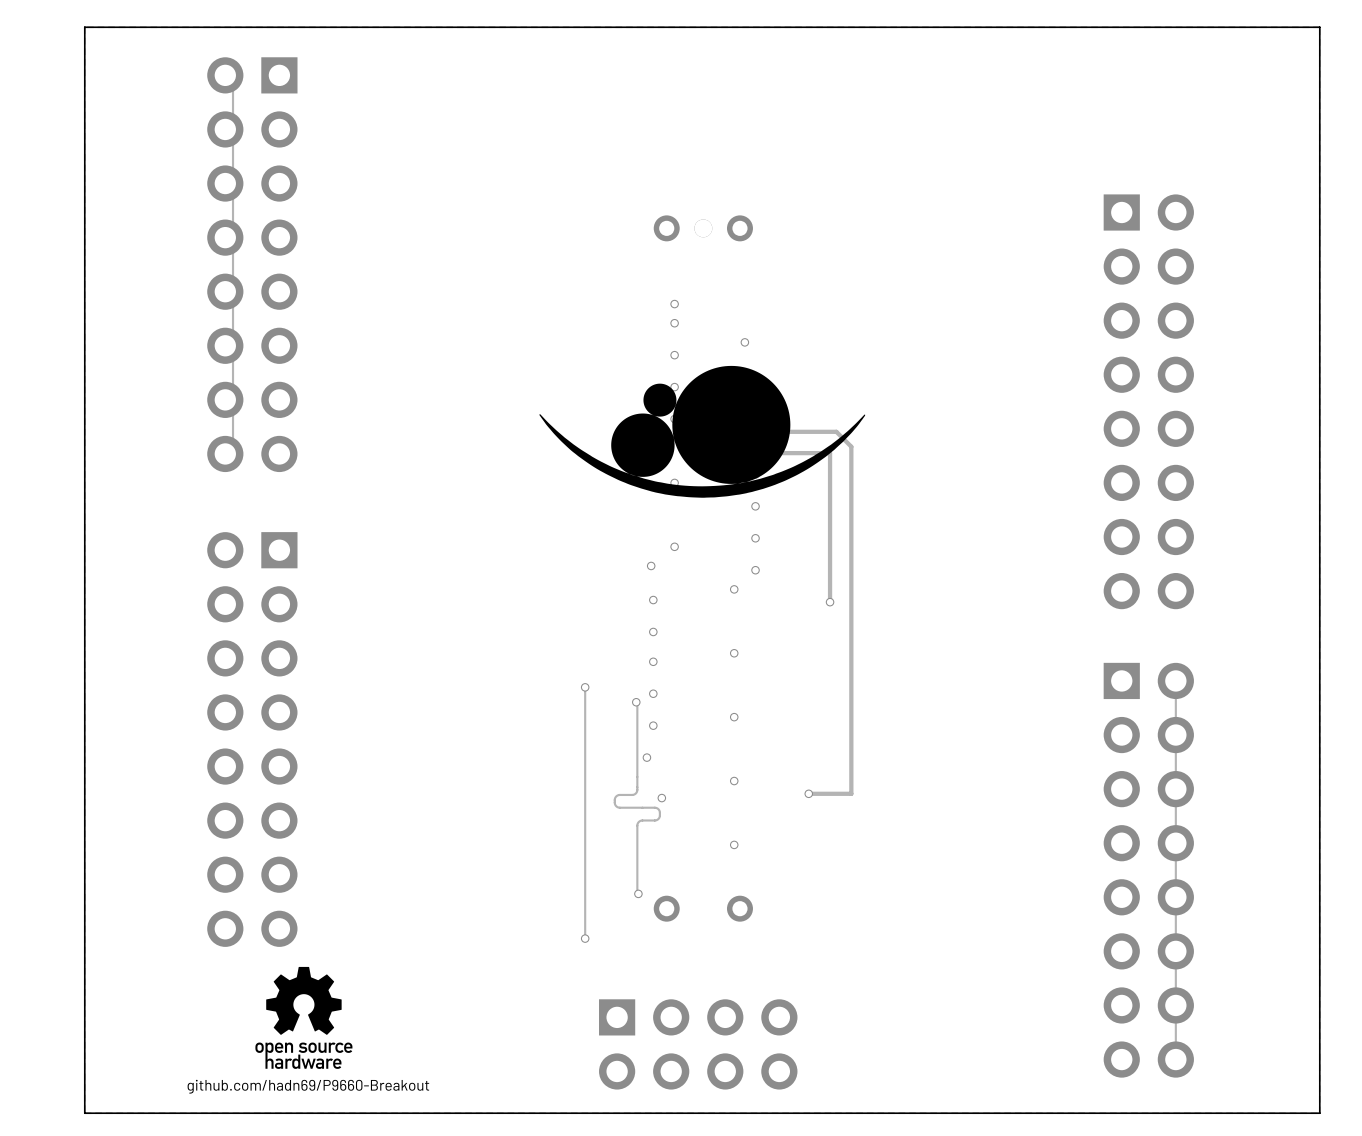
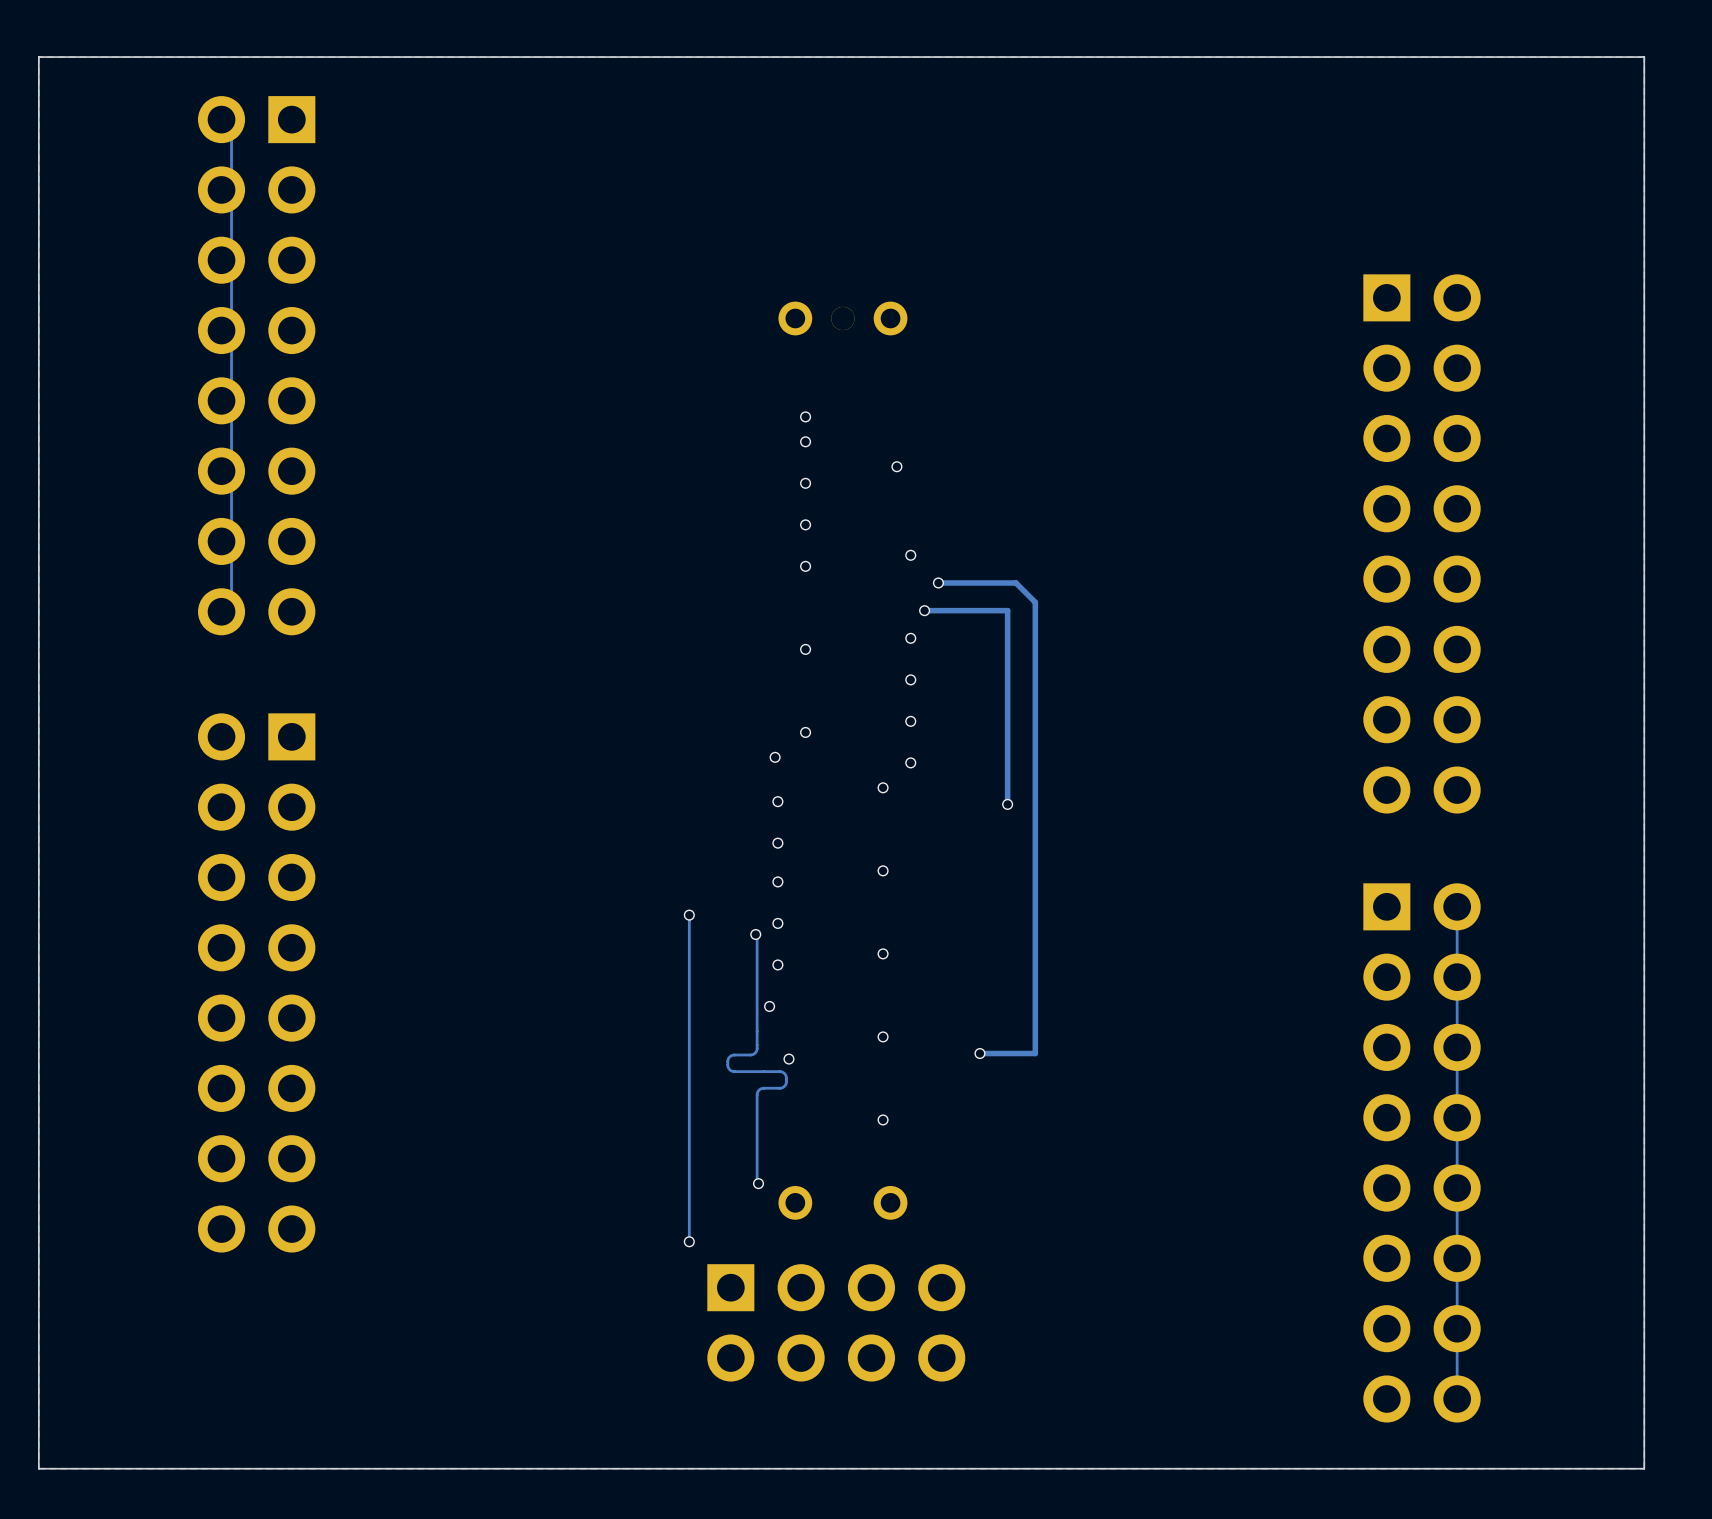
drawing: [539, 365, 866, 498] -> none
drawing: [255, 966, 353, 1069] -> none
part position: (698, 1044) -> (836, 1322)
text: github.com/hadn69/P9660-Breakout (308, 1086) -> none

